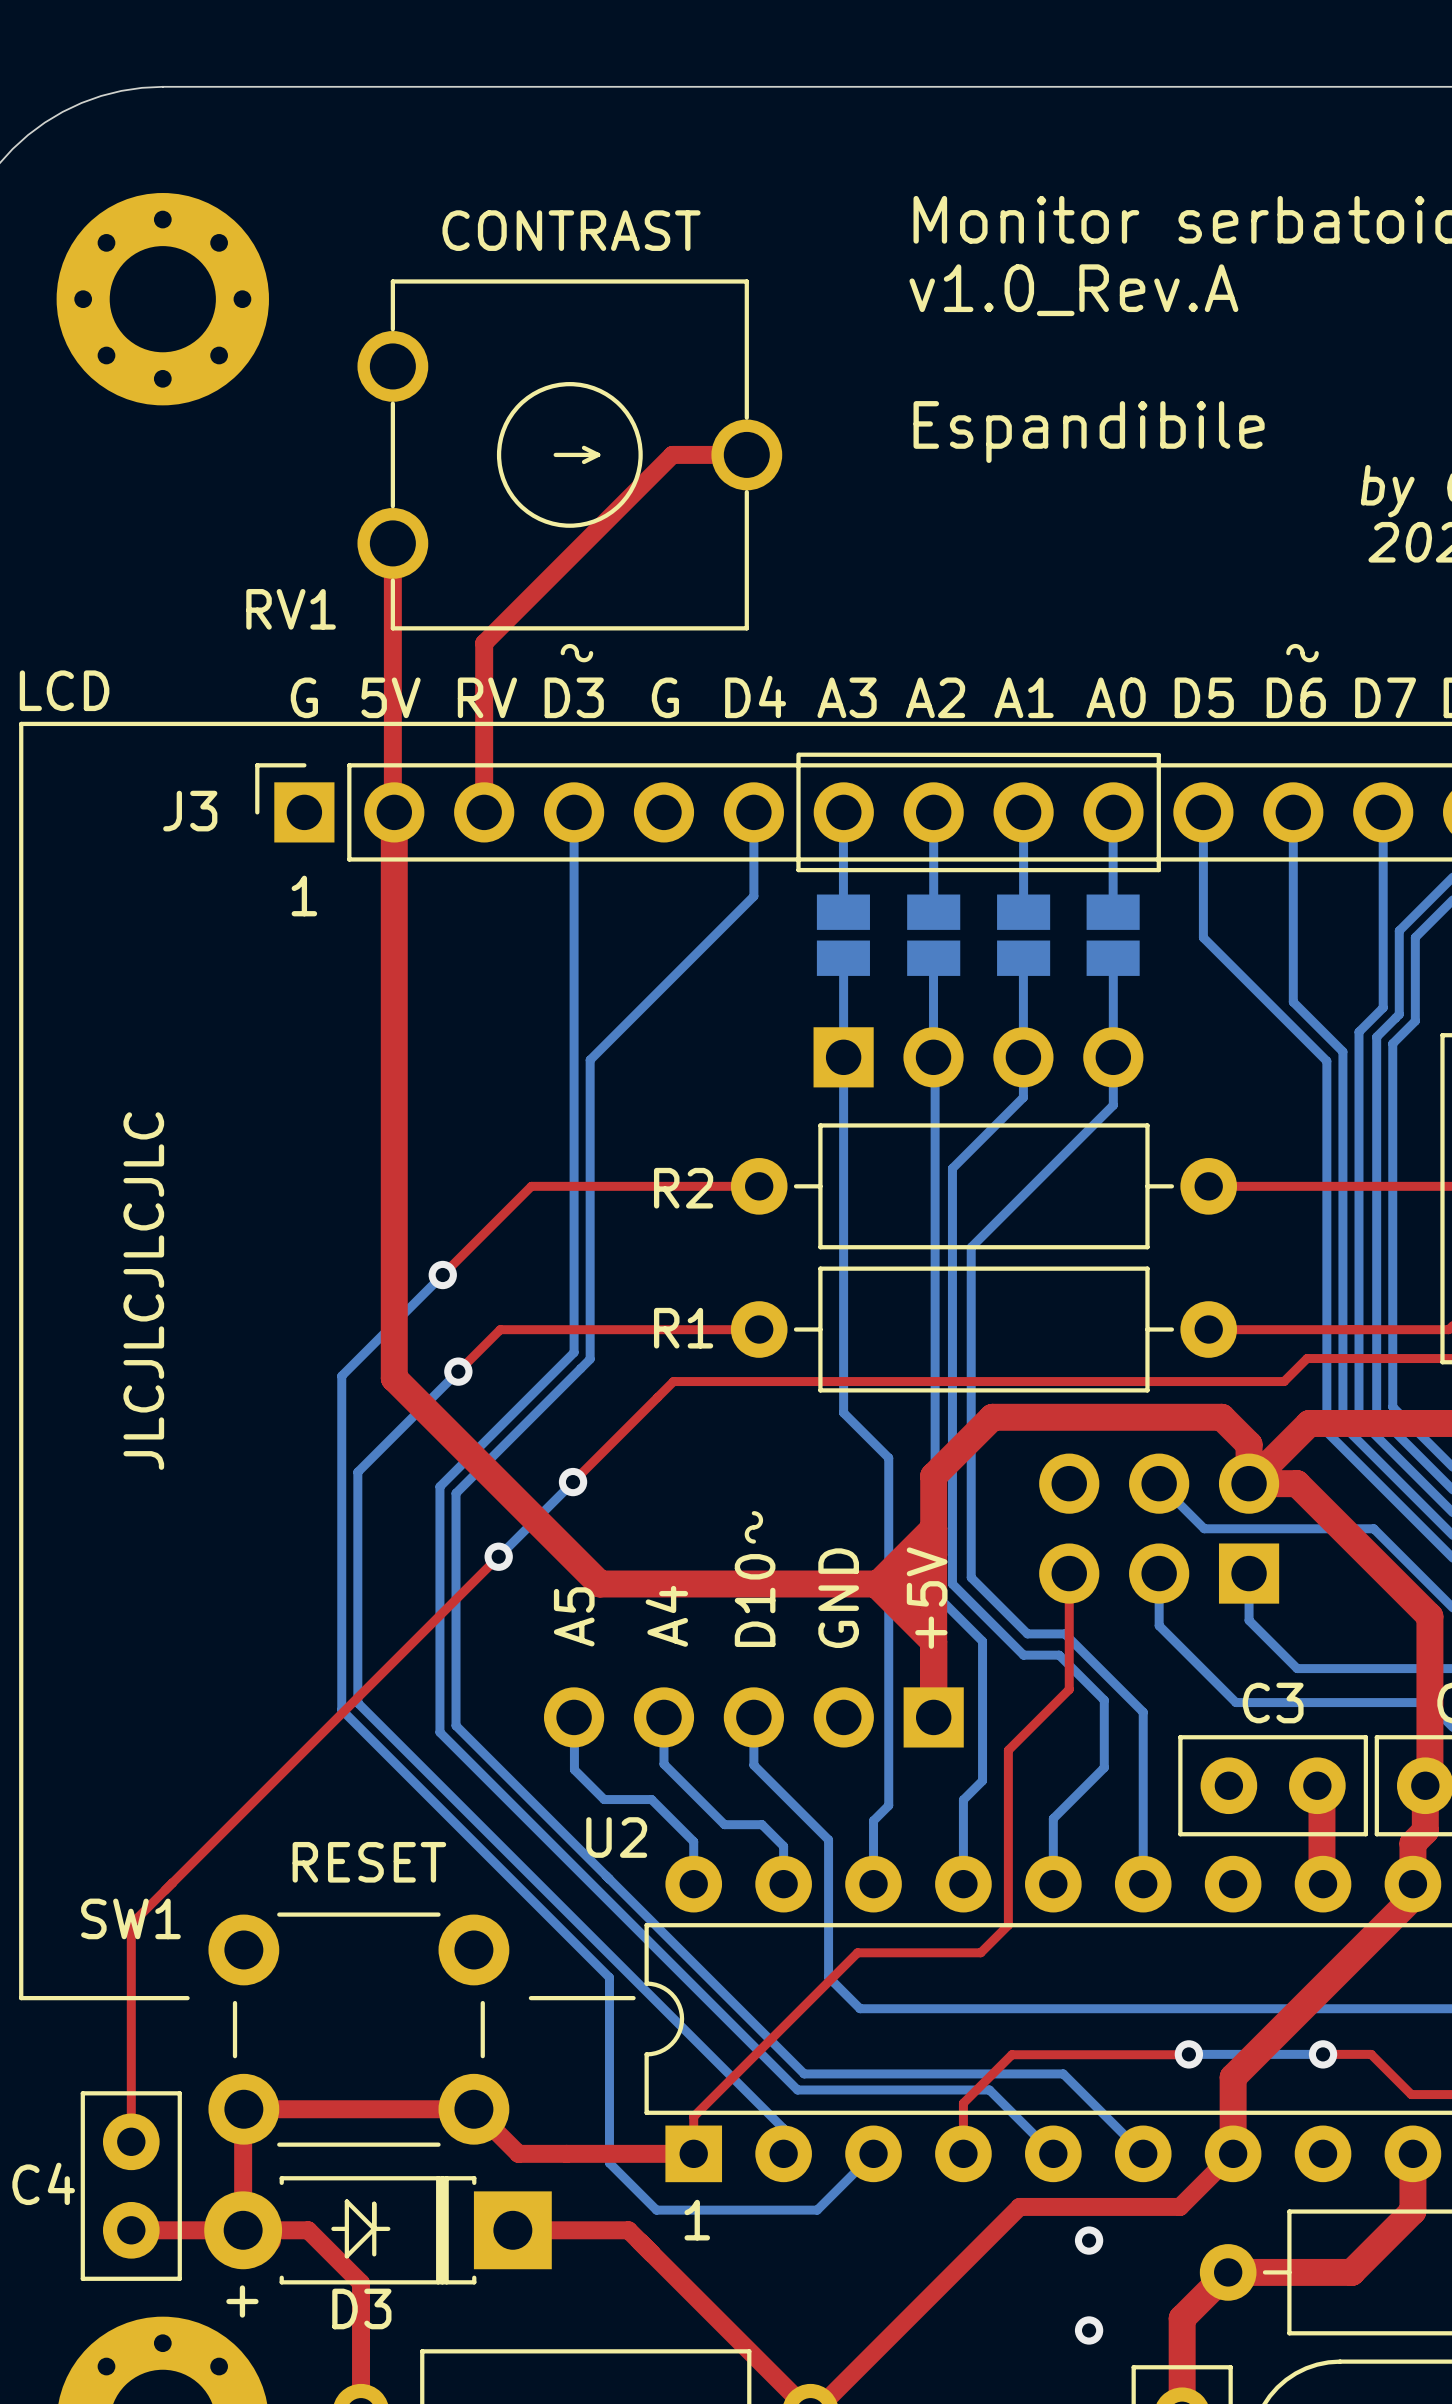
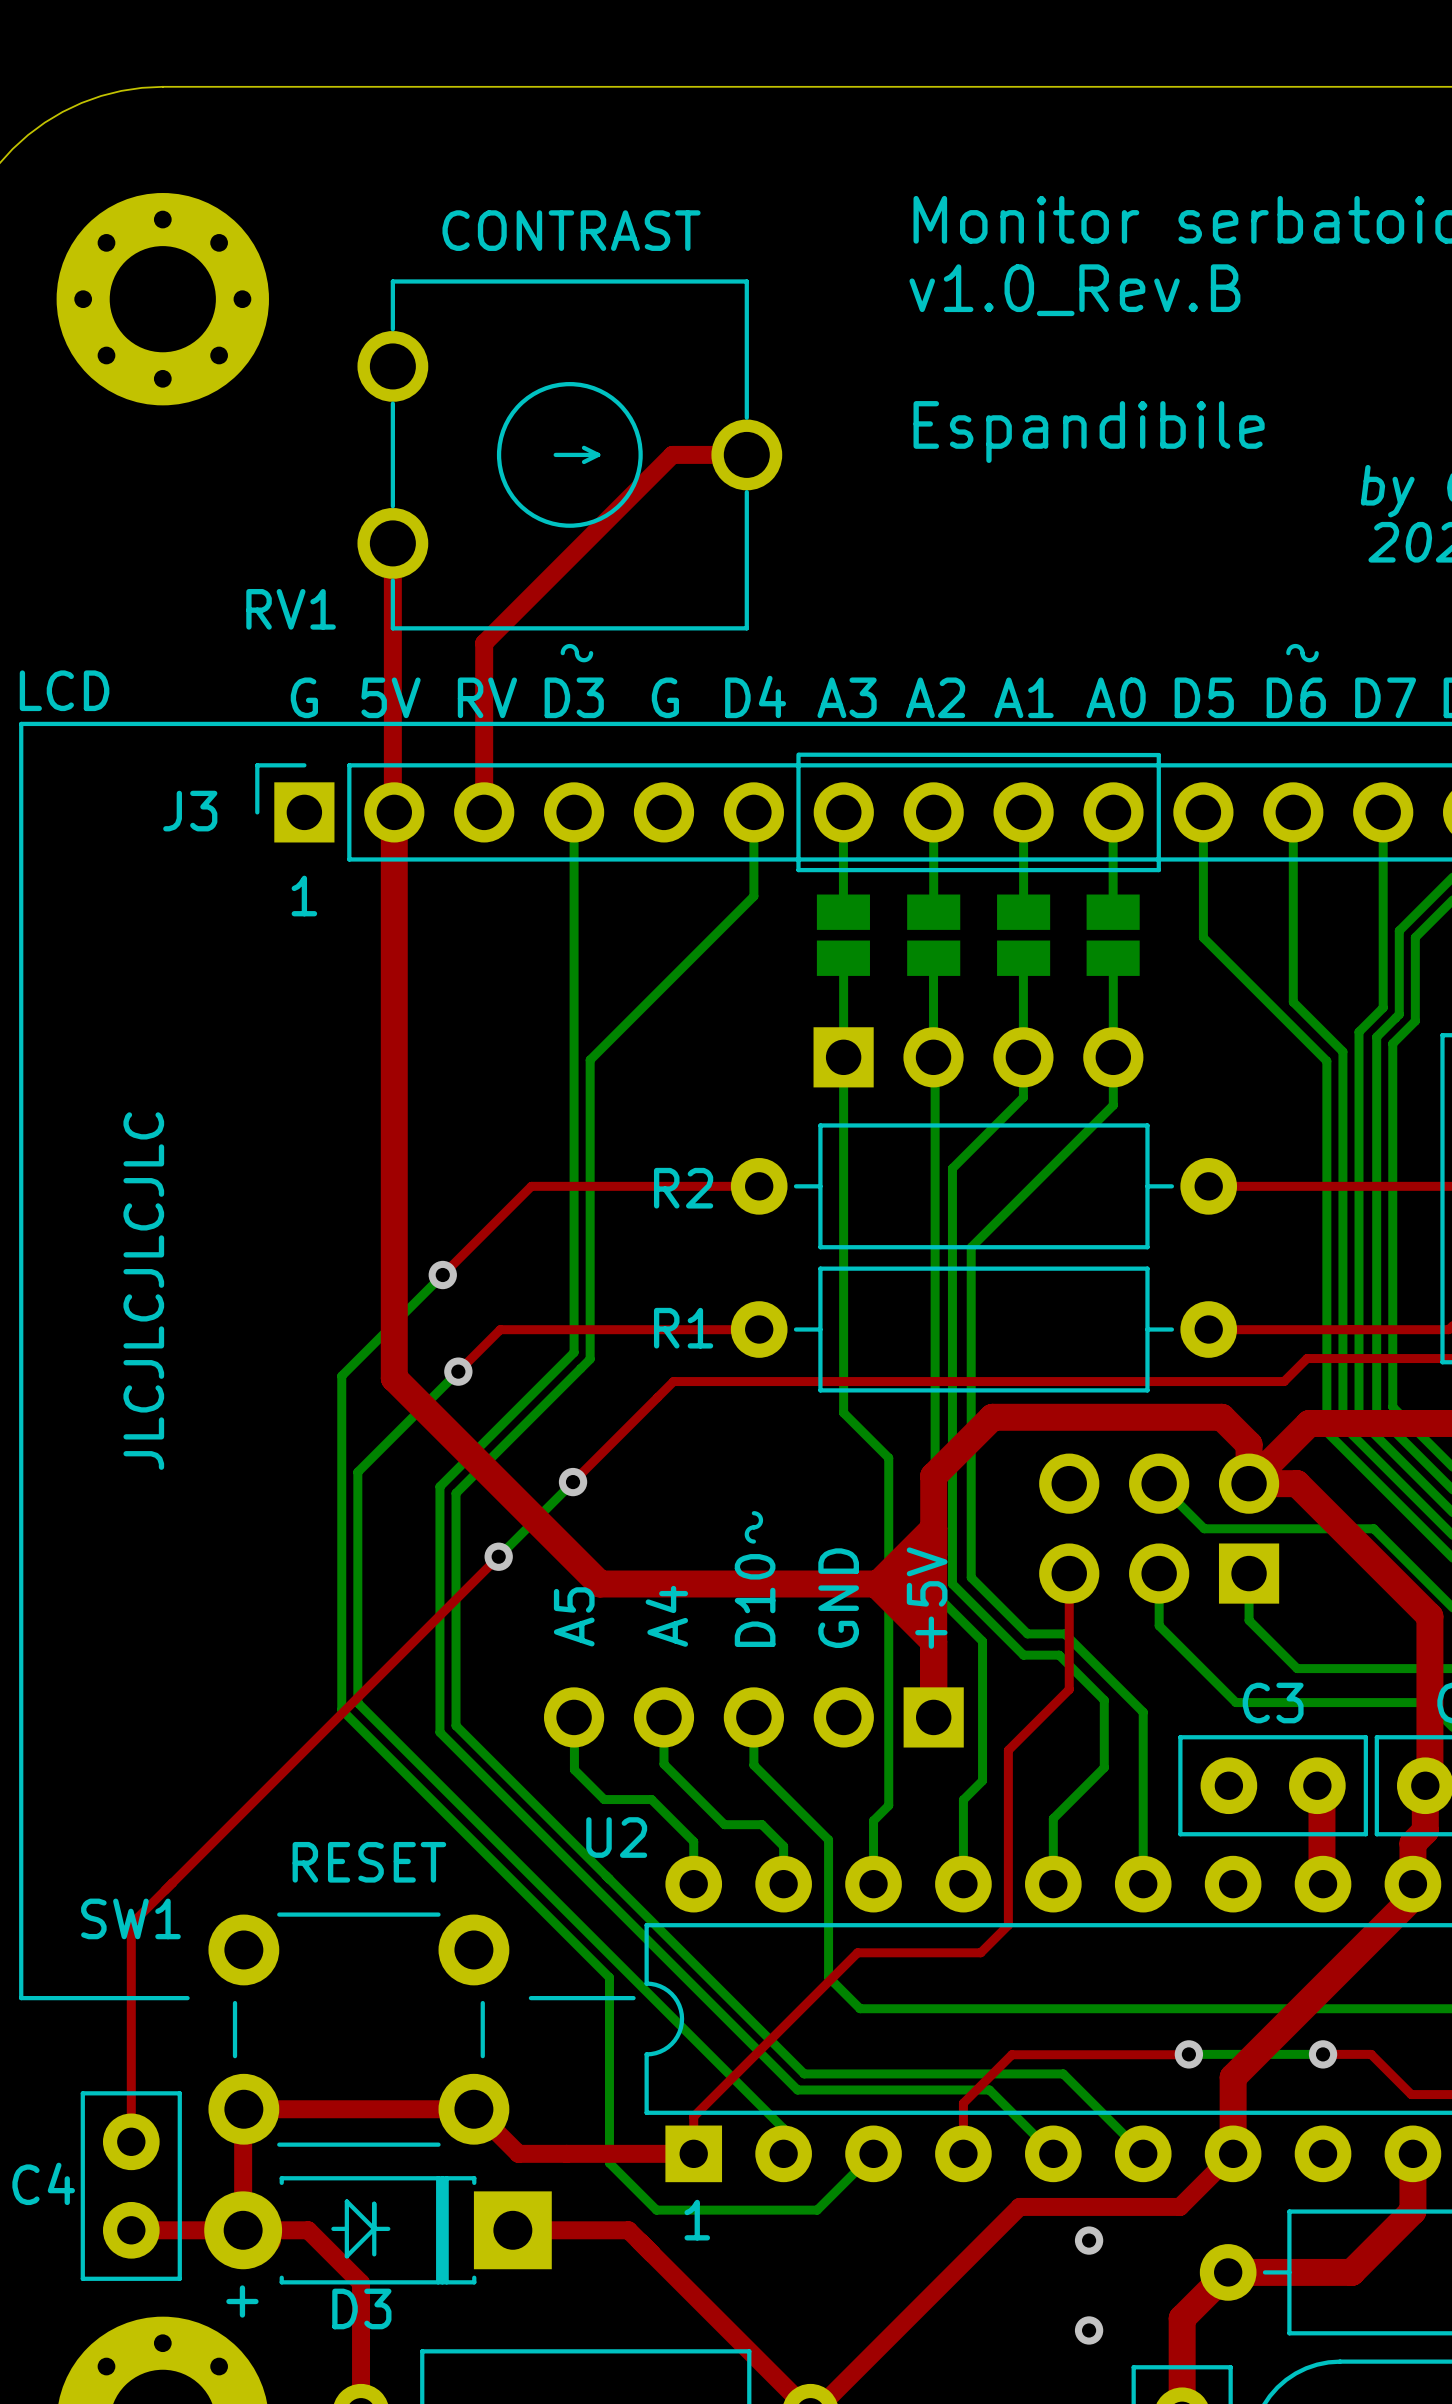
text: v1.0_Rev.A (1073, 290) -> v1.0_Rev.B (1074, 290)

